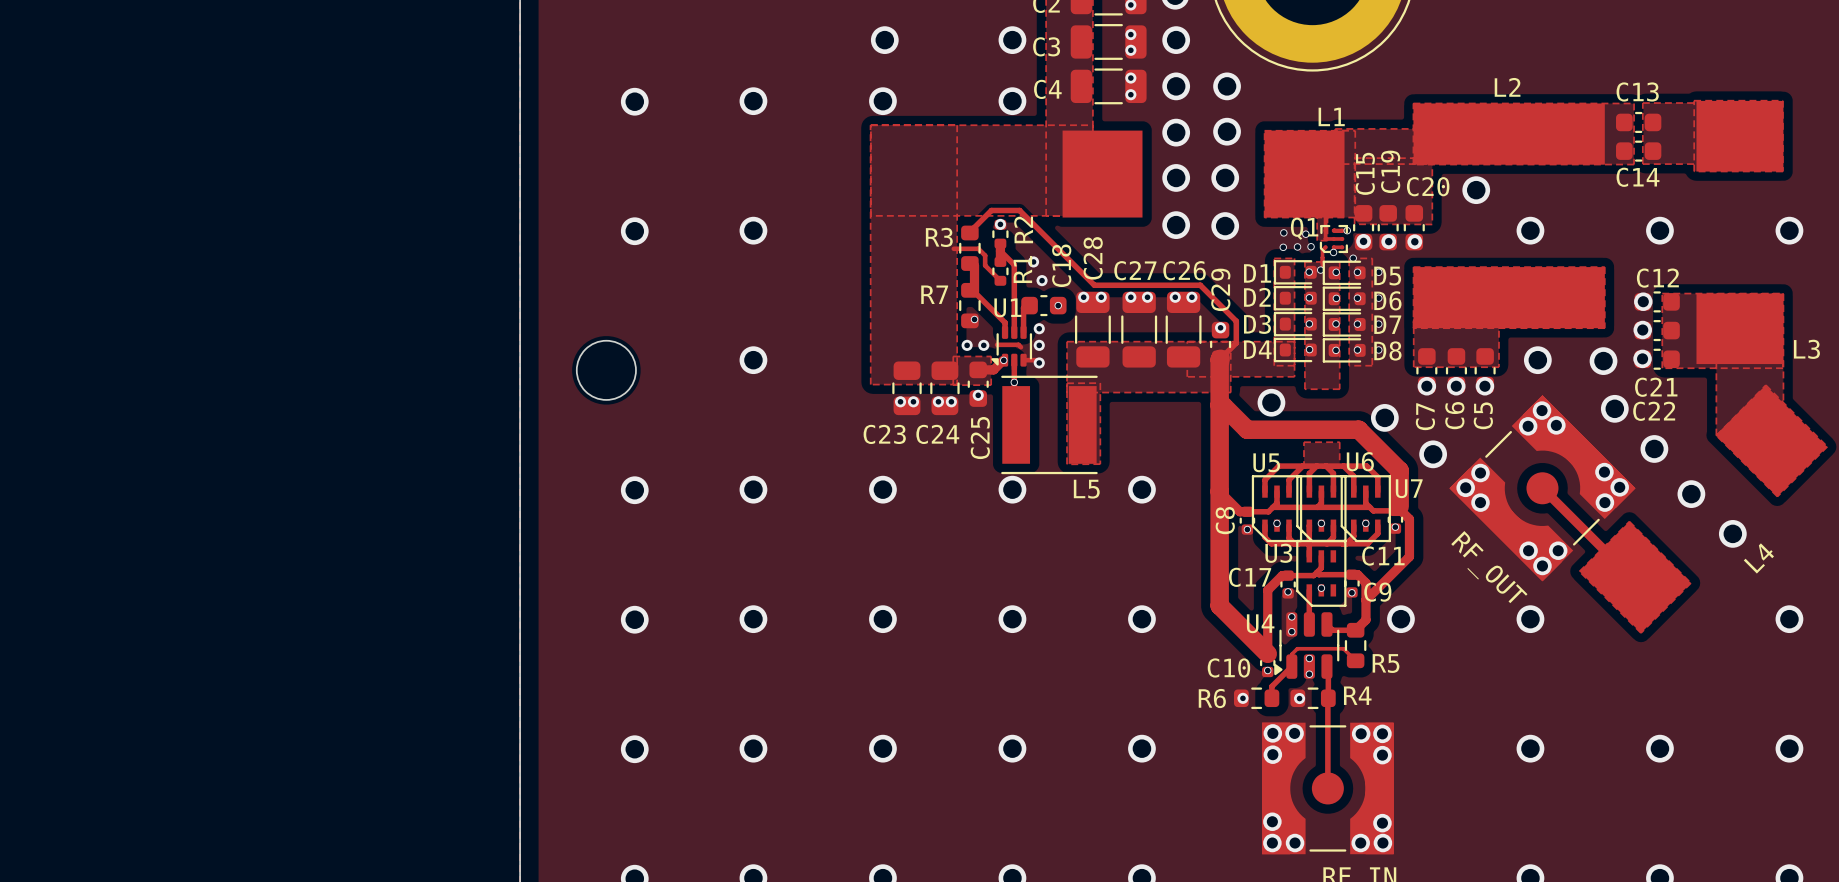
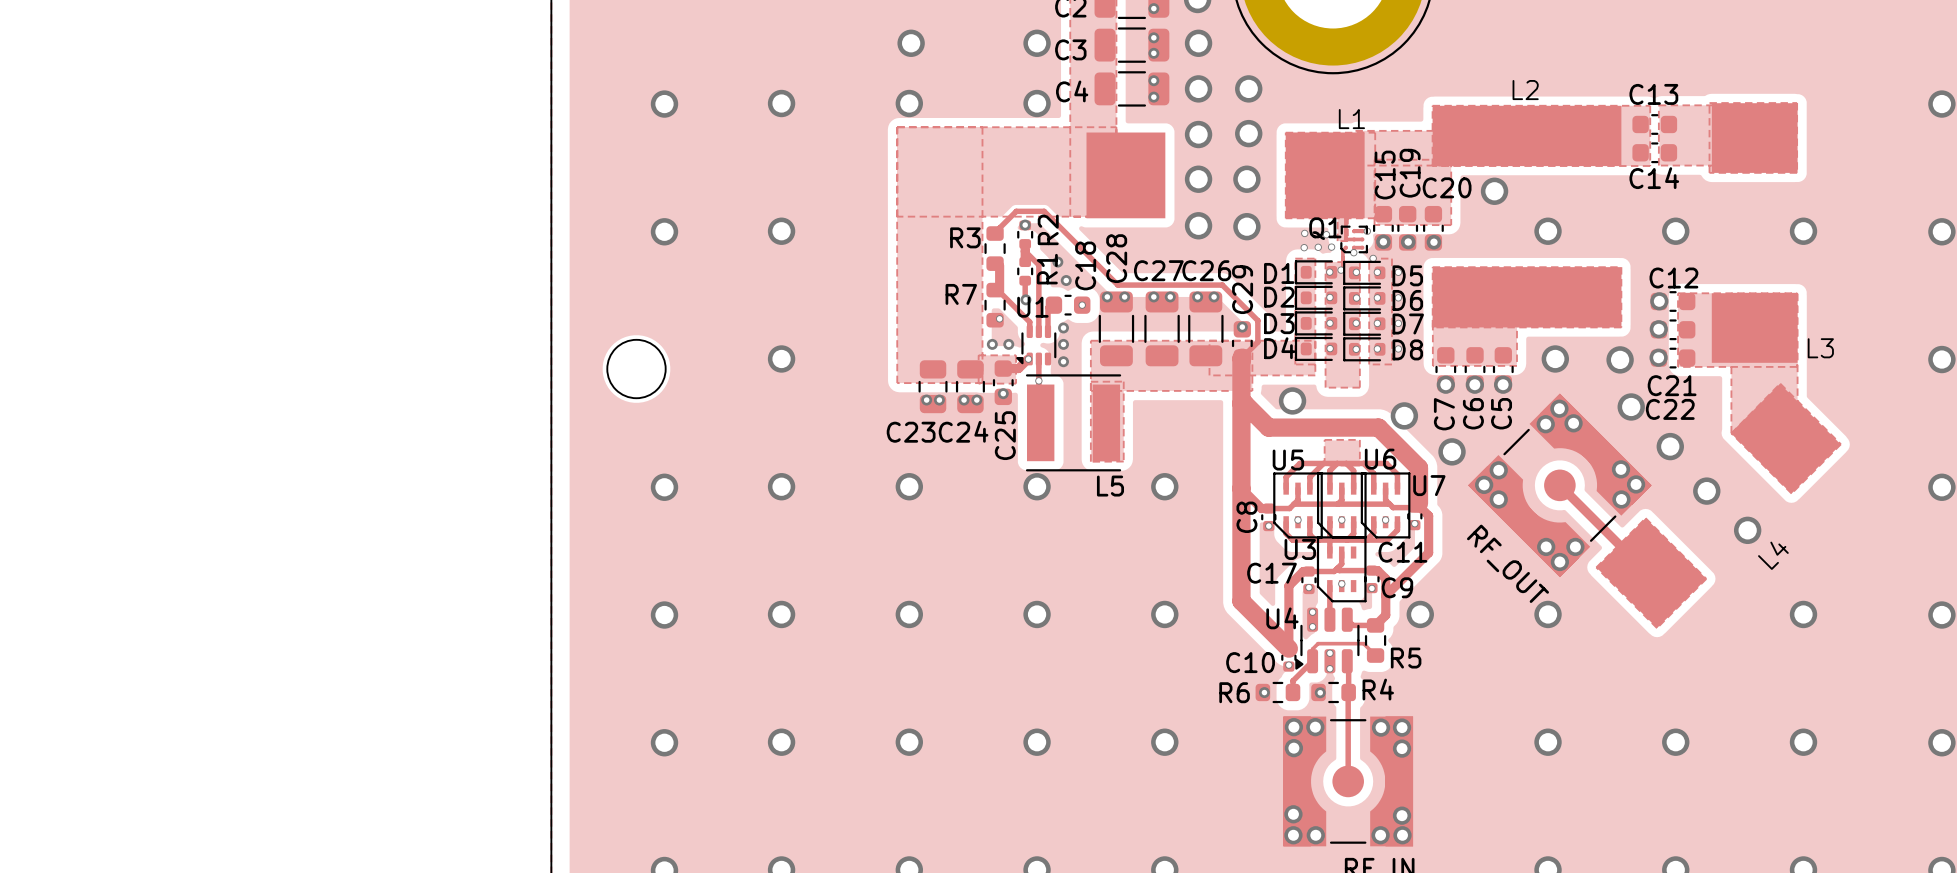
track: (953, 248) (978, 248) (985, 255) (985, 265) (1000, 280) -> (1025, 299) (1025, 280)
via: none -> (1025, 299)
track: (997, 344) (1018, 344) (1020, 347) -> none
track: (1023, 360) (1036, 360) (1039, 362) -> none

